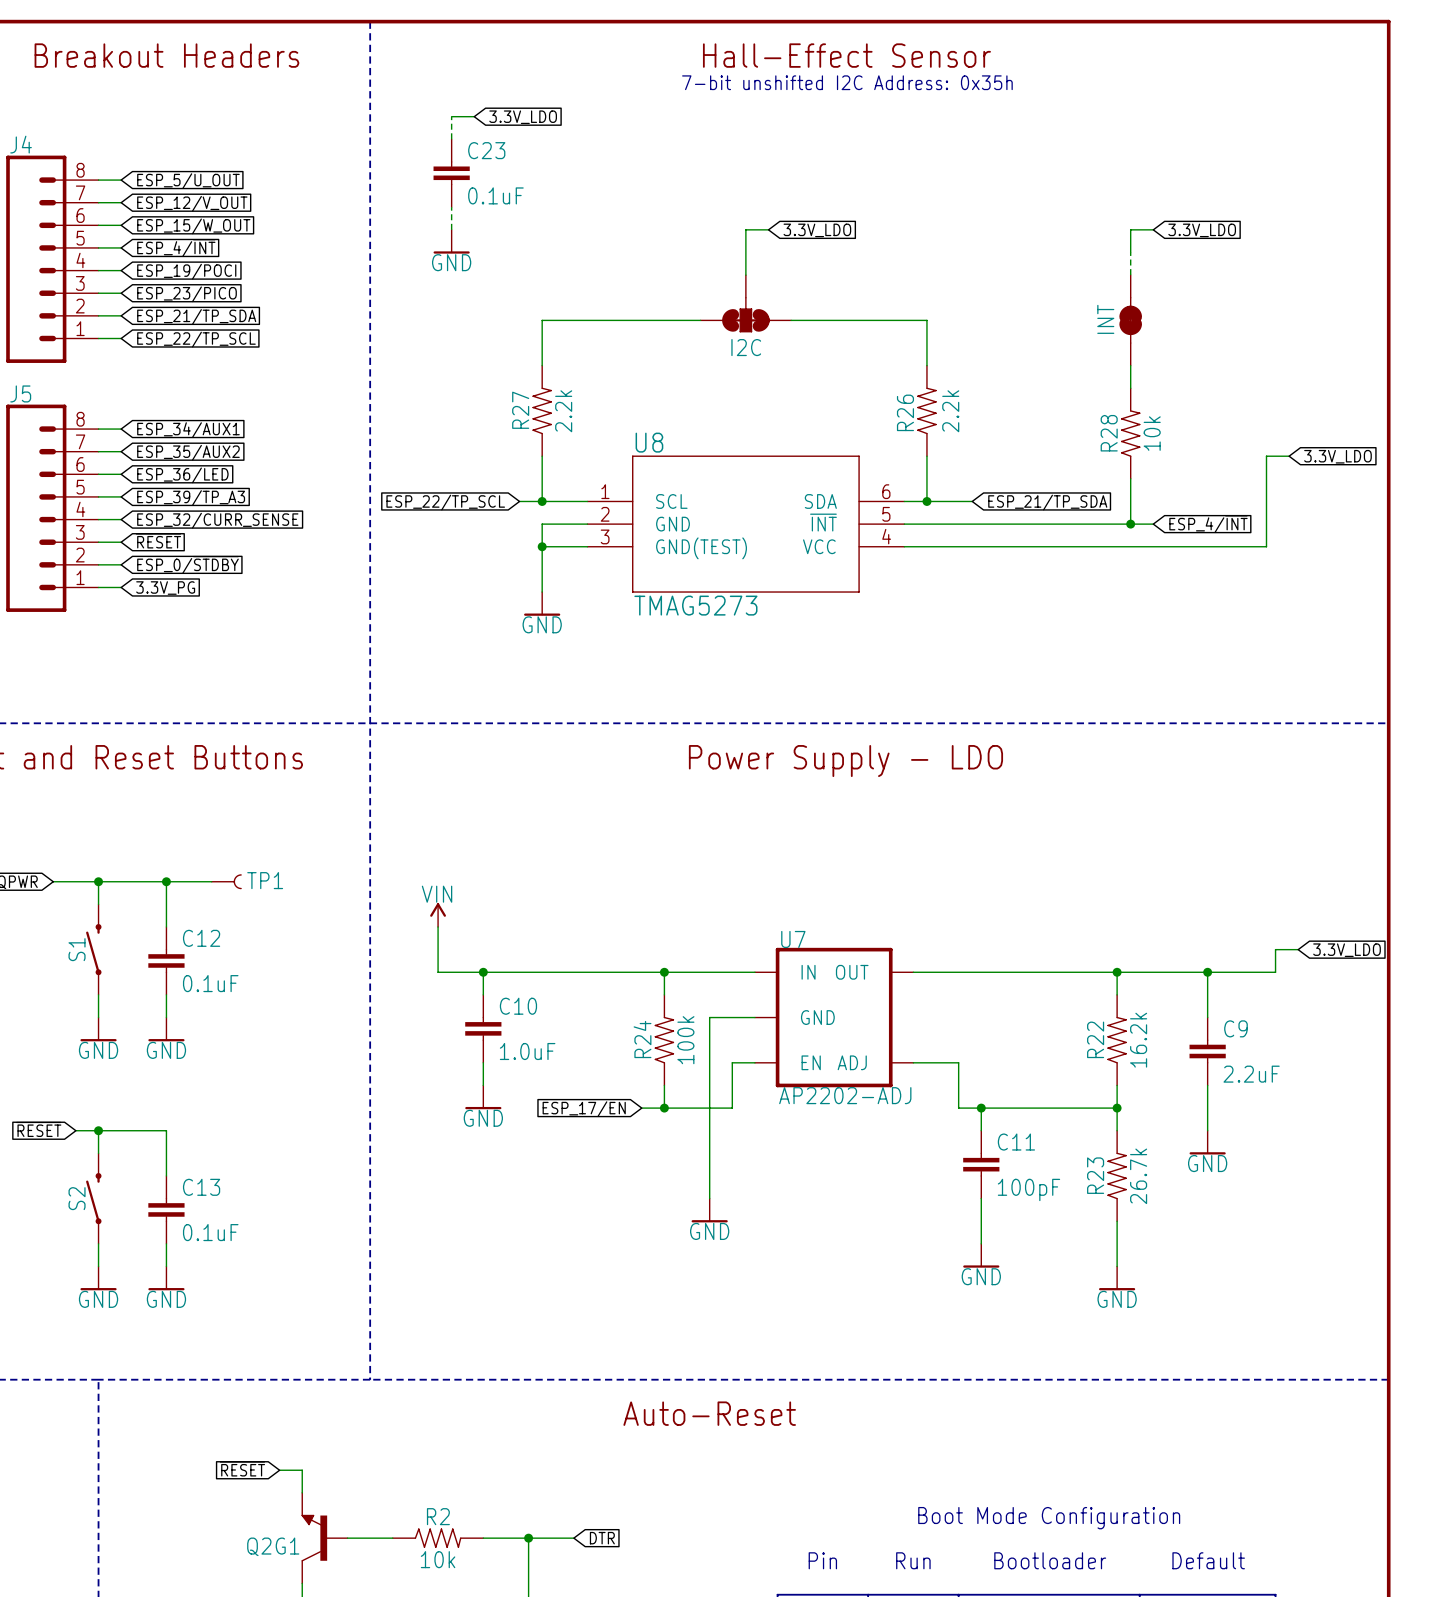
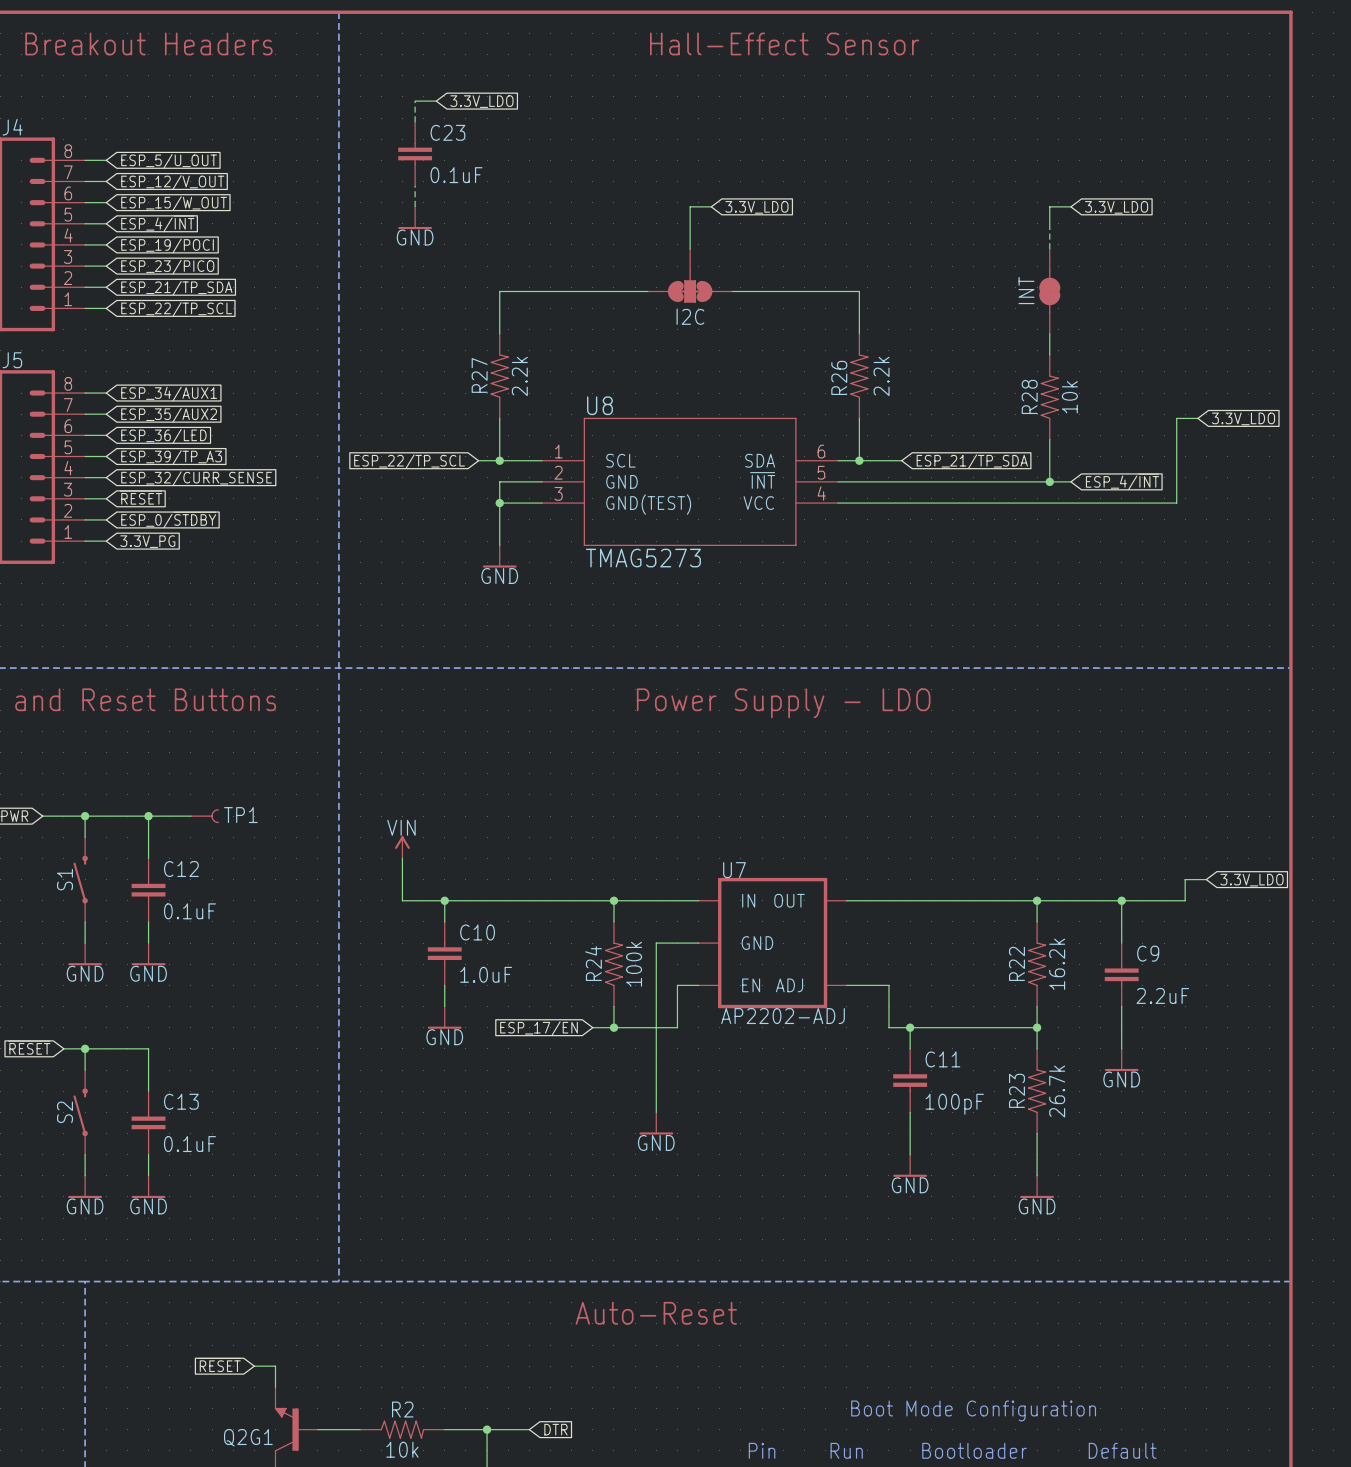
text: 7-bit unshifted I2C Address: 0x35h (847, 82) -> none

